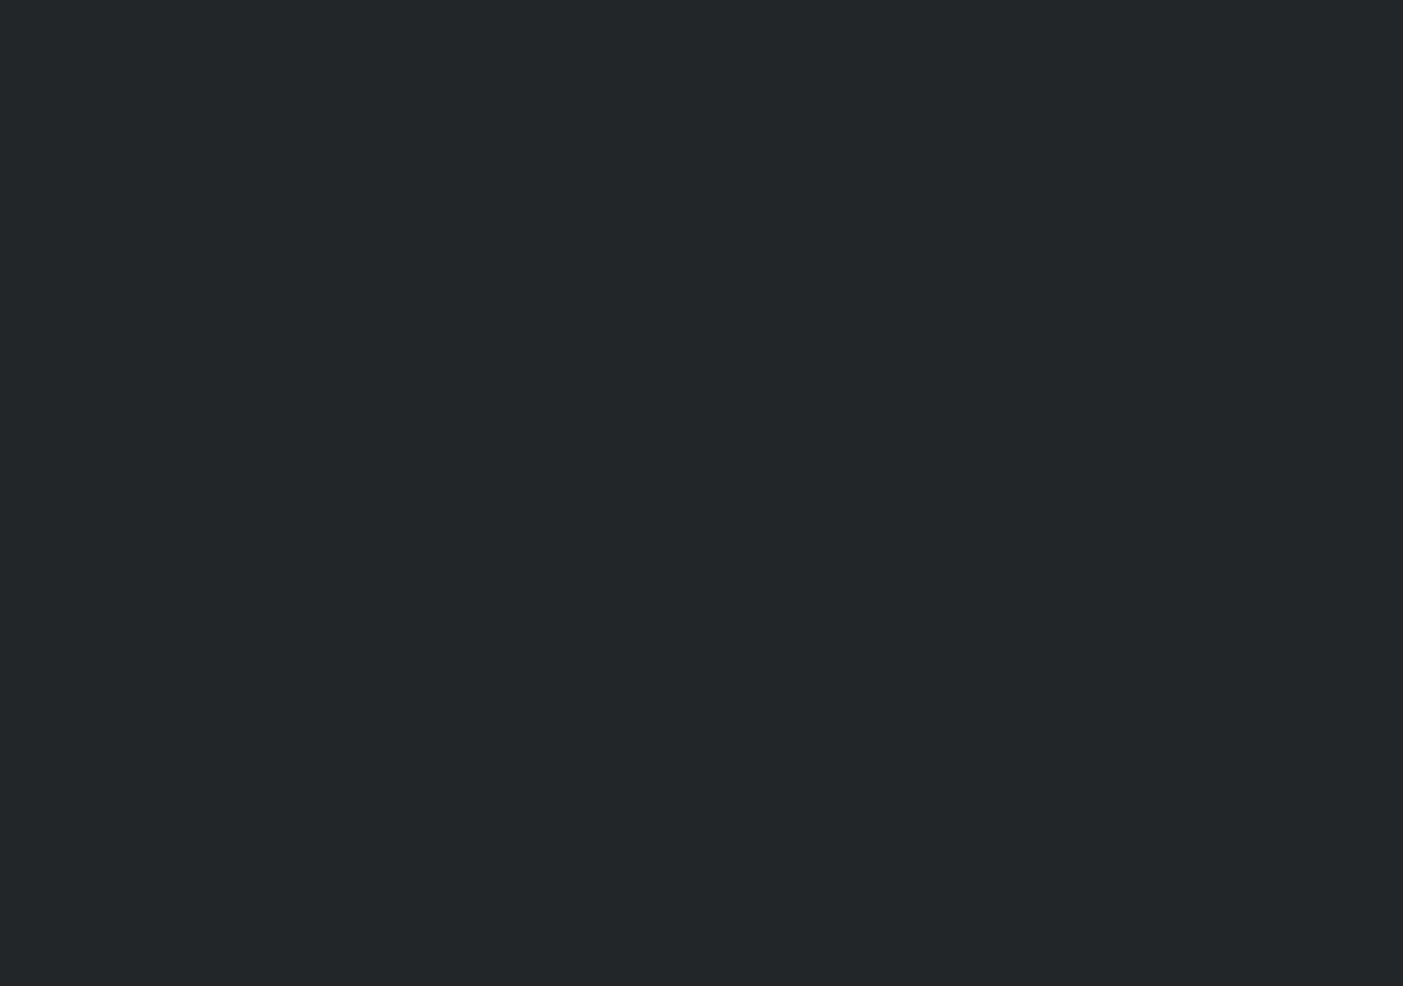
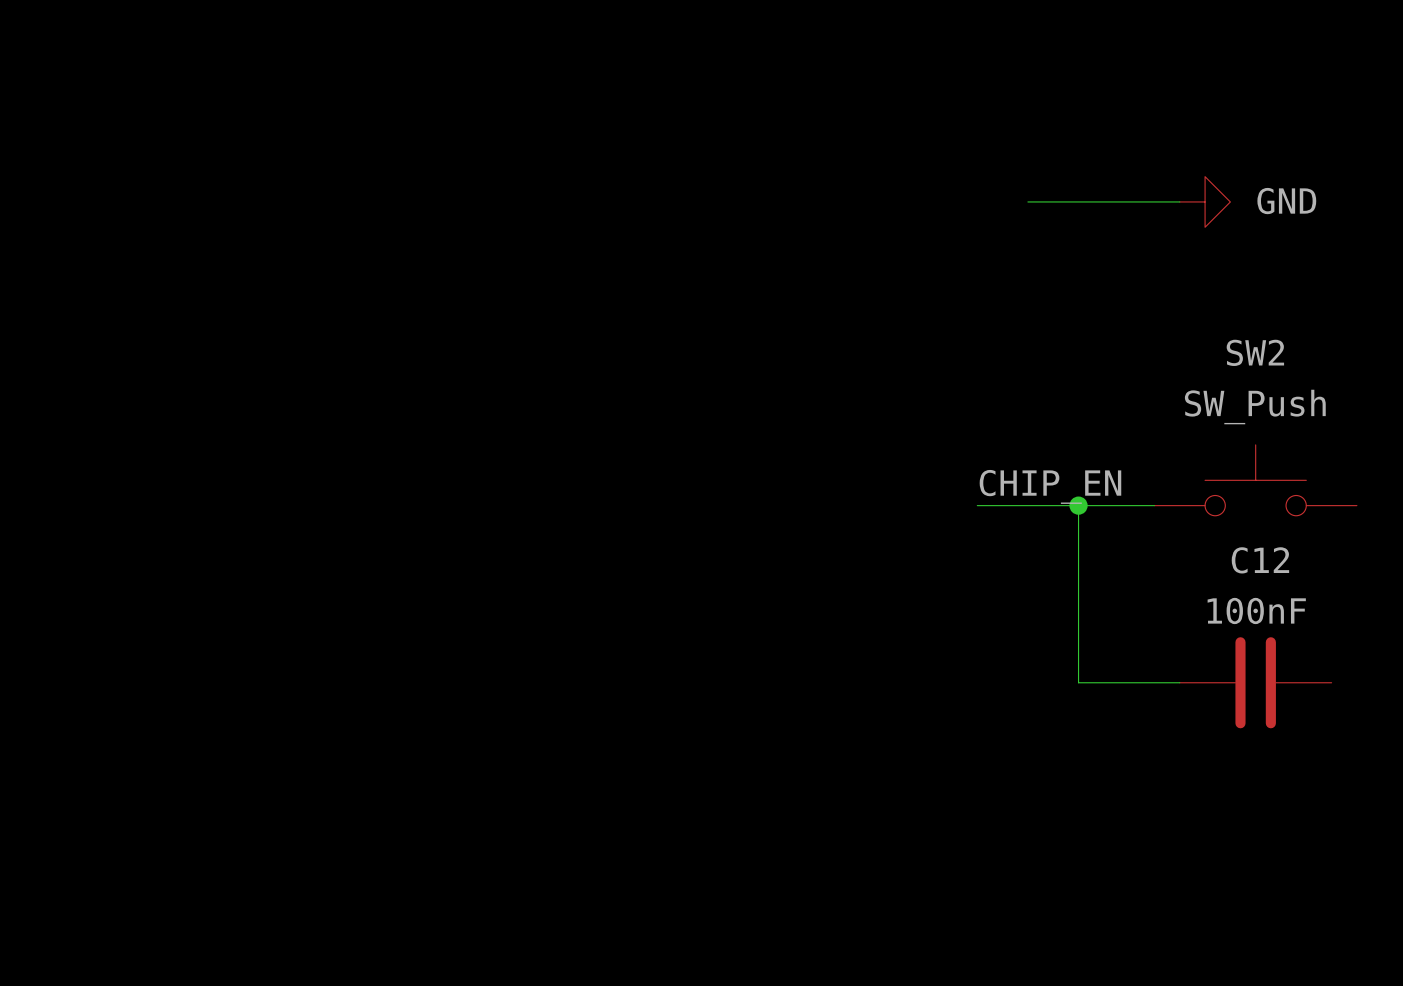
wire: none -> (1027, 201) (1179, 201)
power symbol: none -> GND (1205, 201)
SW2: none -> SW_Push (1255, 480)
label: none -> CHIP_EN (1050, 486)
wire: none -> (977, 505) (1154, 505)
wire: none -> (1078, 505) (1078, 682) (1179, 682)
junction: none -> (1078, 505)
C12: none -> 100nF (1255, 682)

